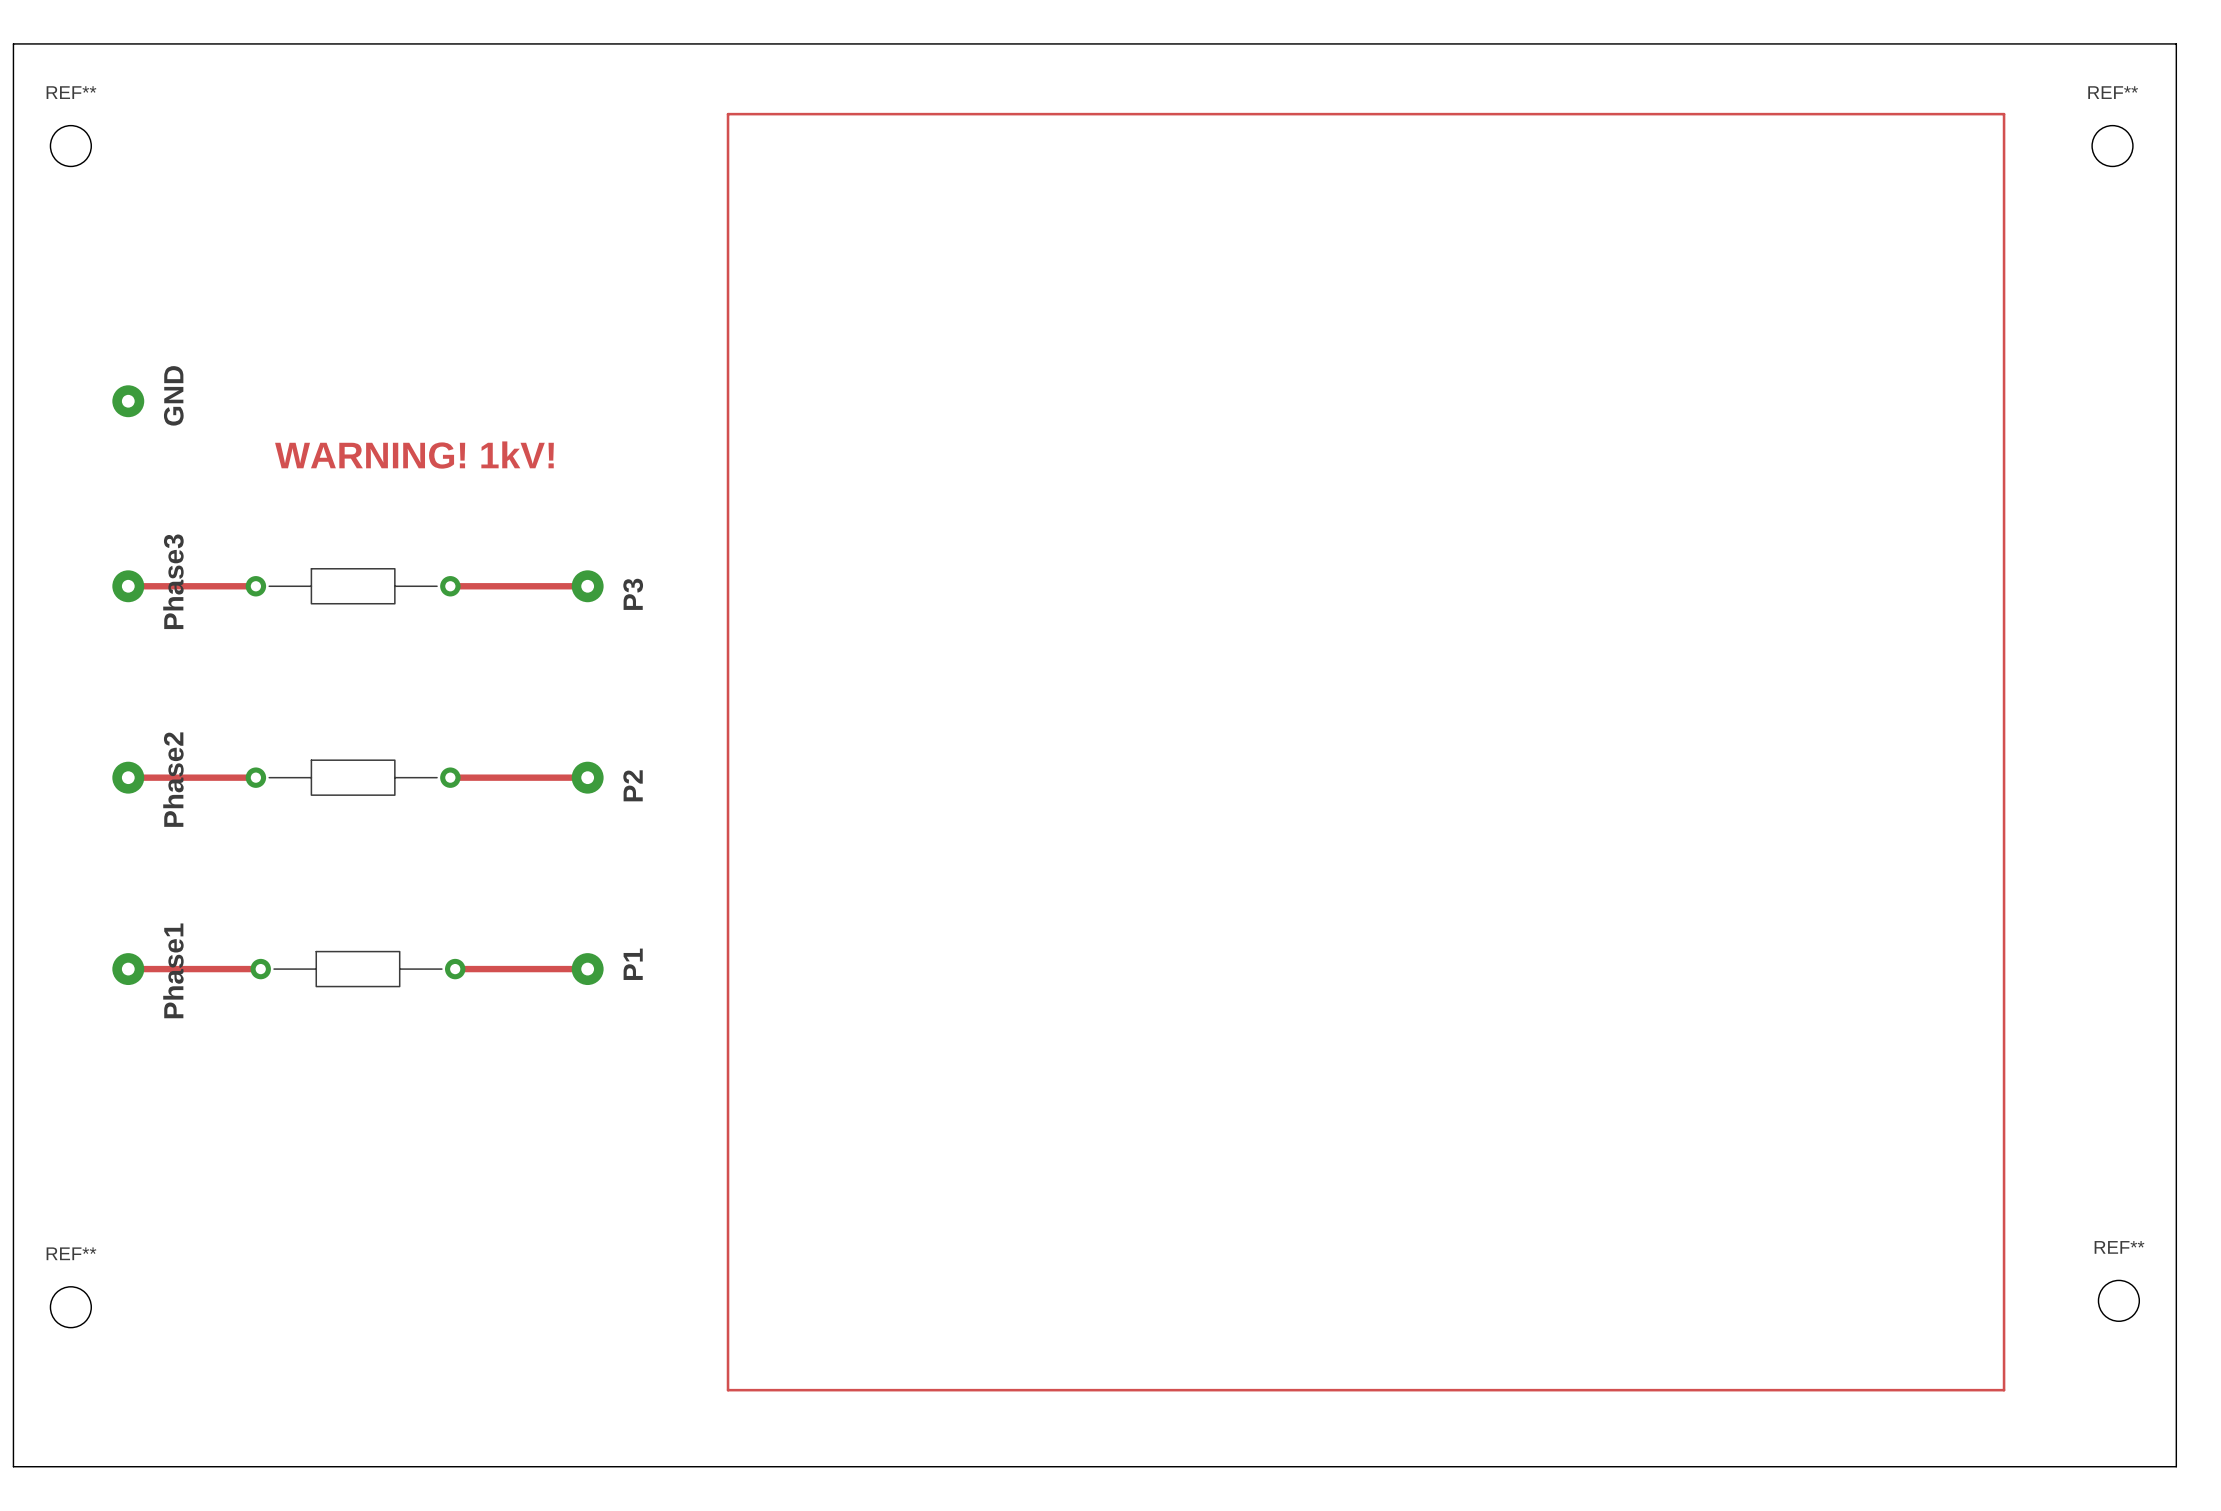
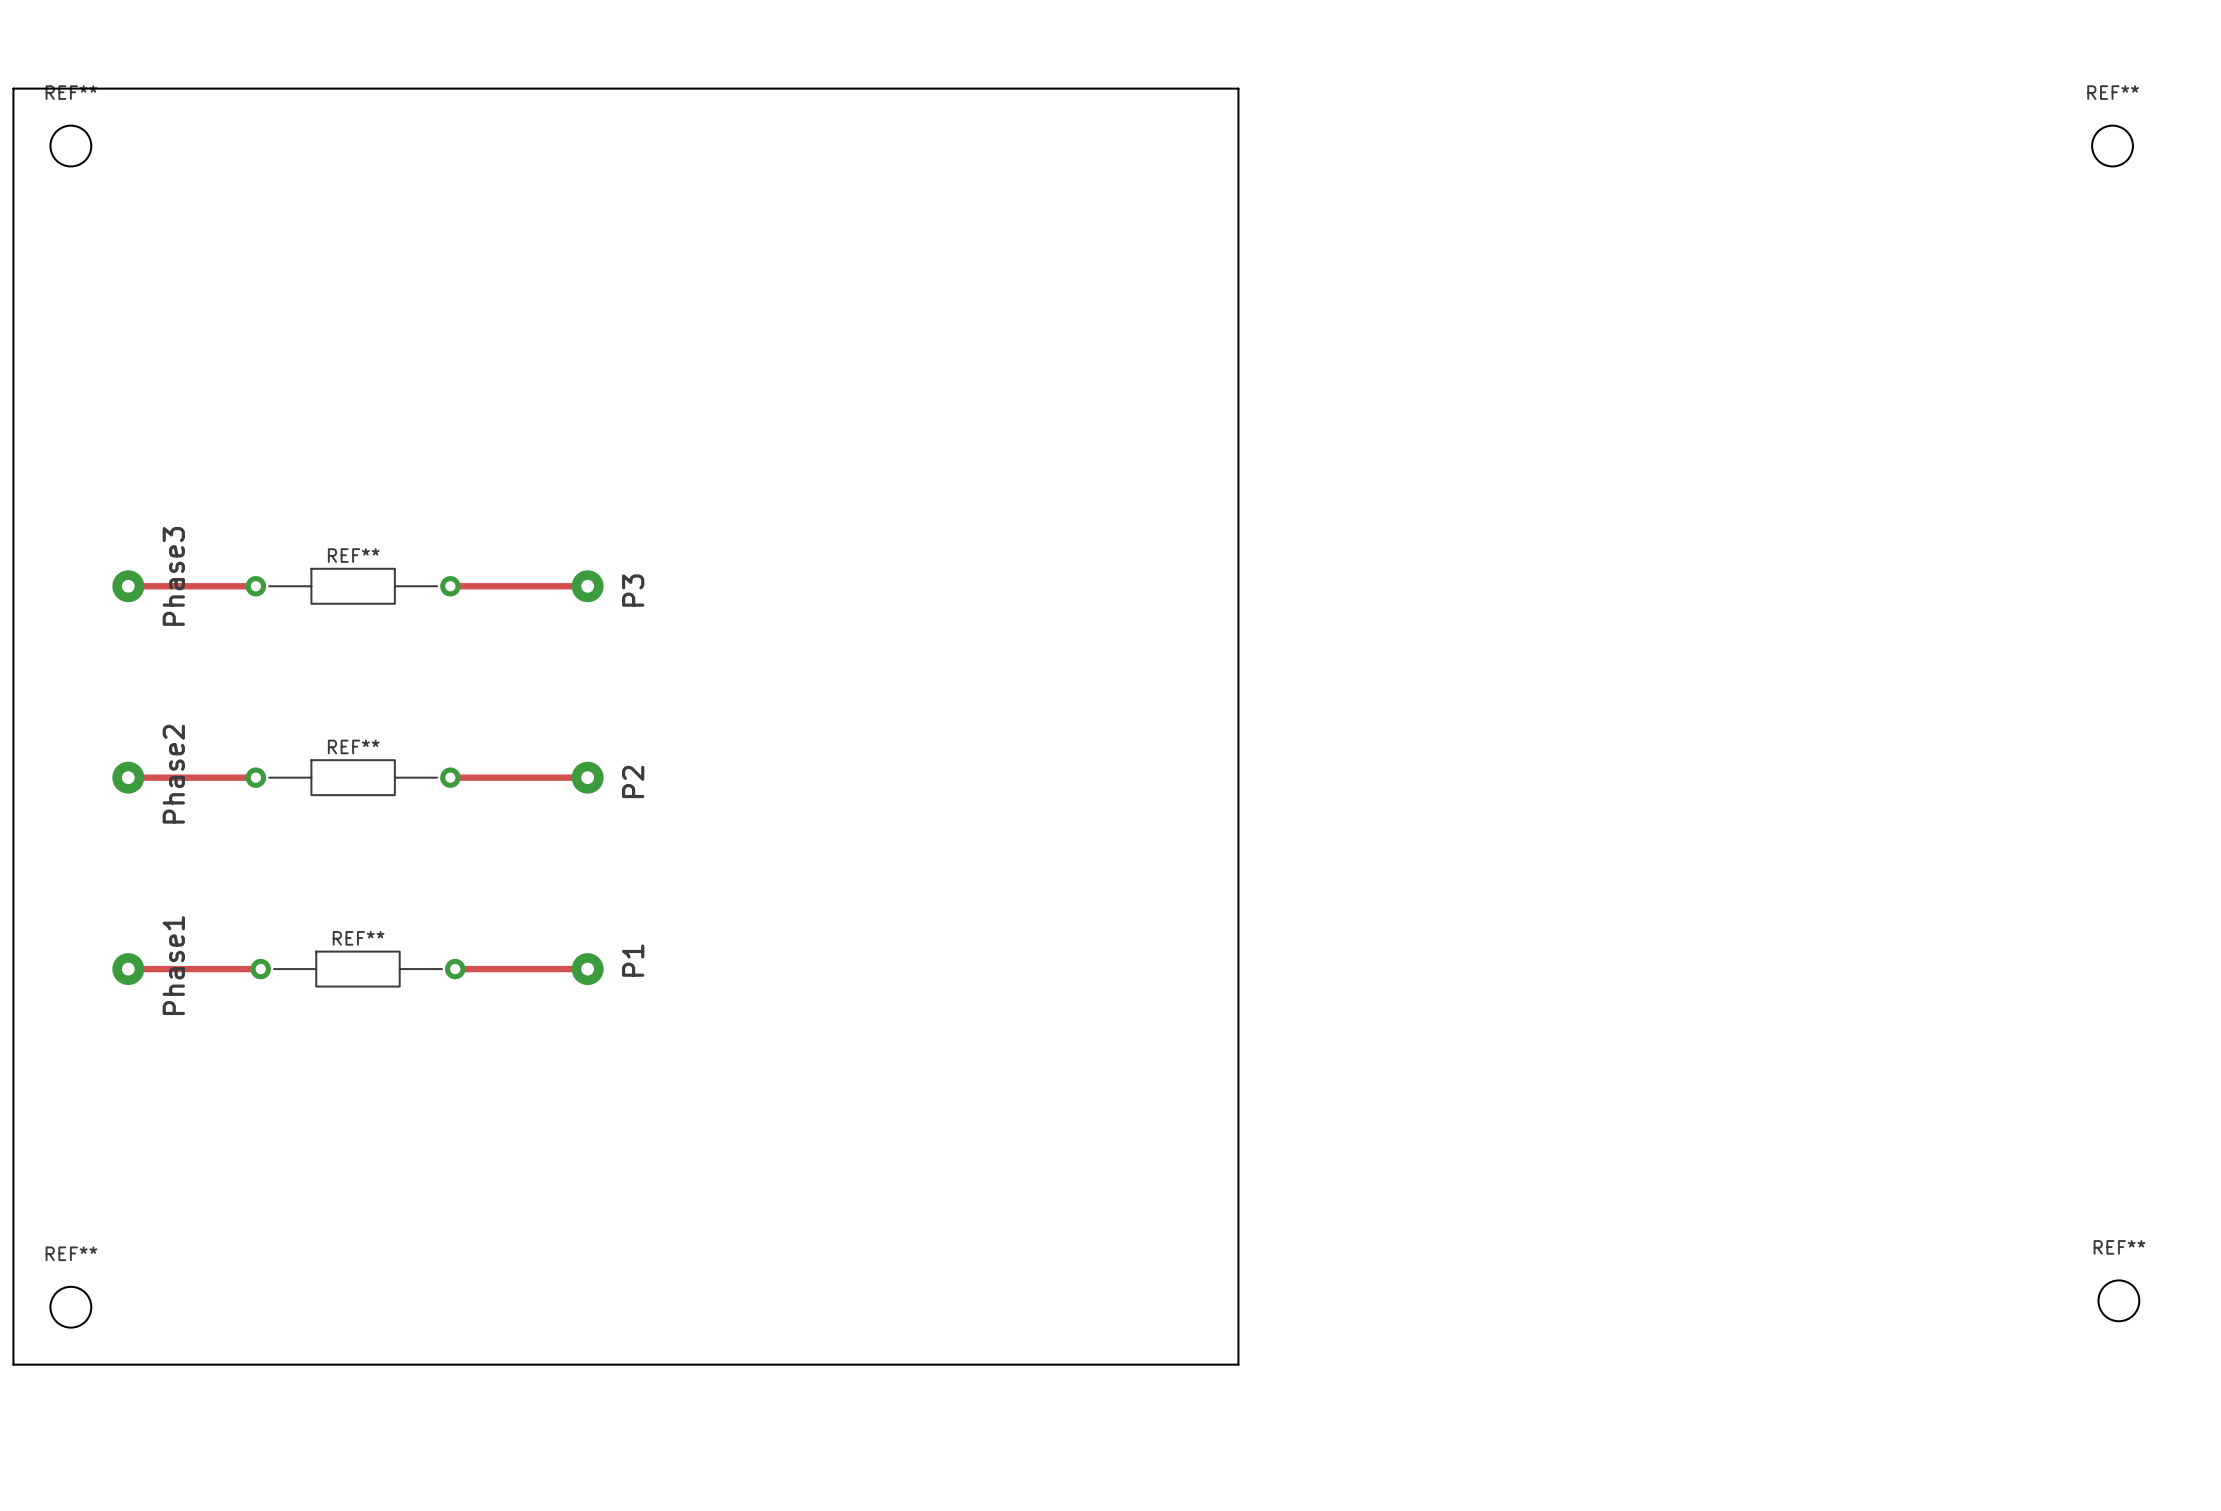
board edge: (13, 88) (13, 43) (2176, 43) (2176, 1466) (13, 1466) (13, 1364) -> (13, 88) (1238, 88) (1238, 1364) (13, 1364)
track: (728, 114) (2004, 114) (2004, 1390) (728, 1390) (728, 114) -> none
part: (128, 401) -> none
text: WARNING! 1kV! (414, 455) -> none
REF** name: none -> REF** (353, 555)
REF** name: none -> REF** (353, 746)
REF** name: none -> REF** (358, 938)

